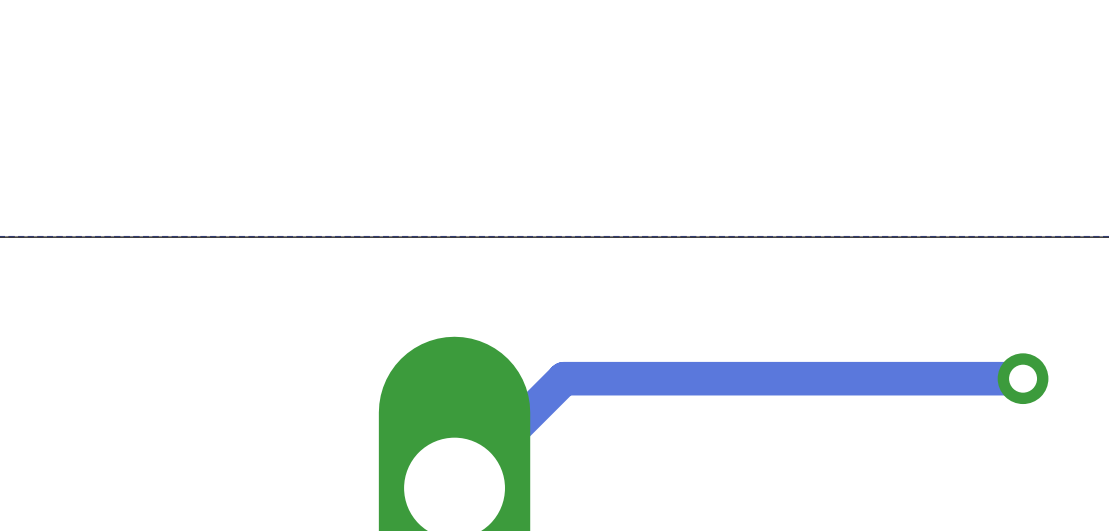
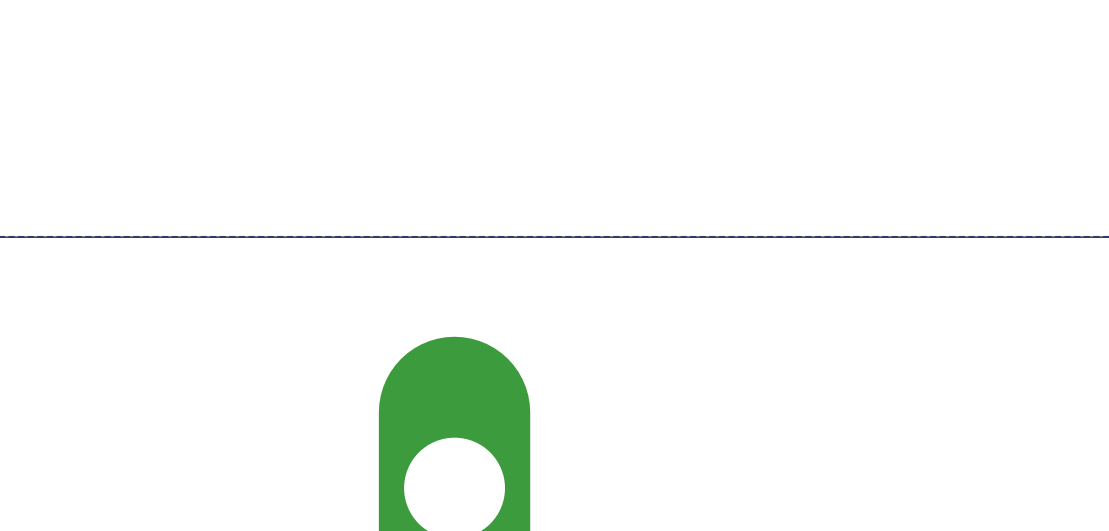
bottom track: (1023, 378) (563, 378) (454, 488) -> none
via: (1023, 378) -> none

